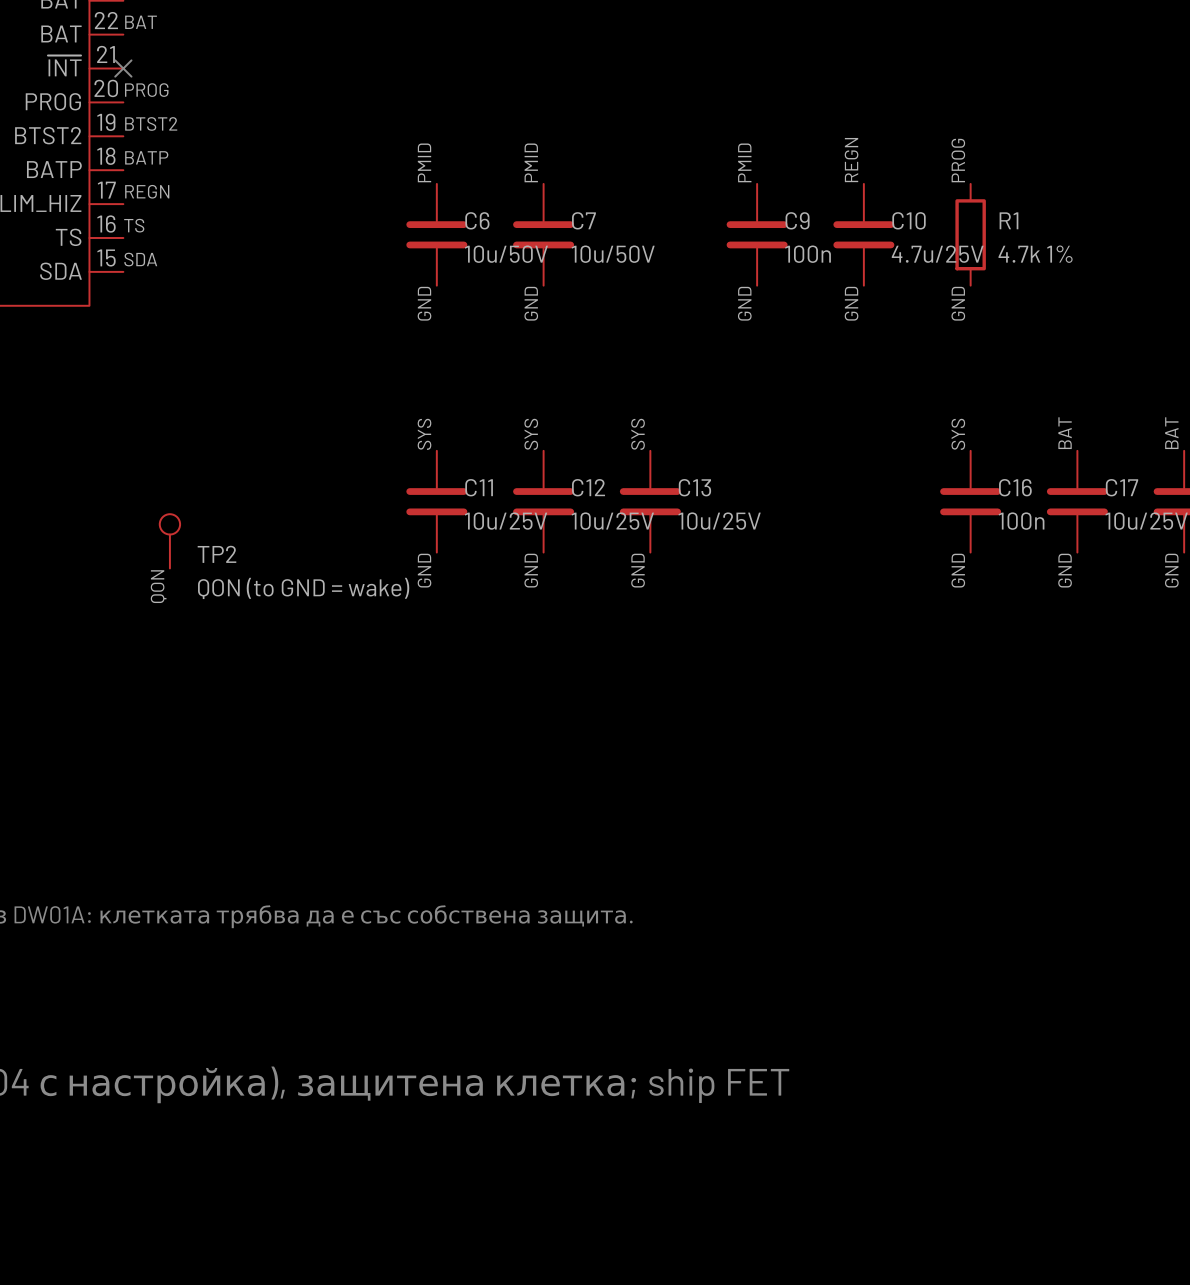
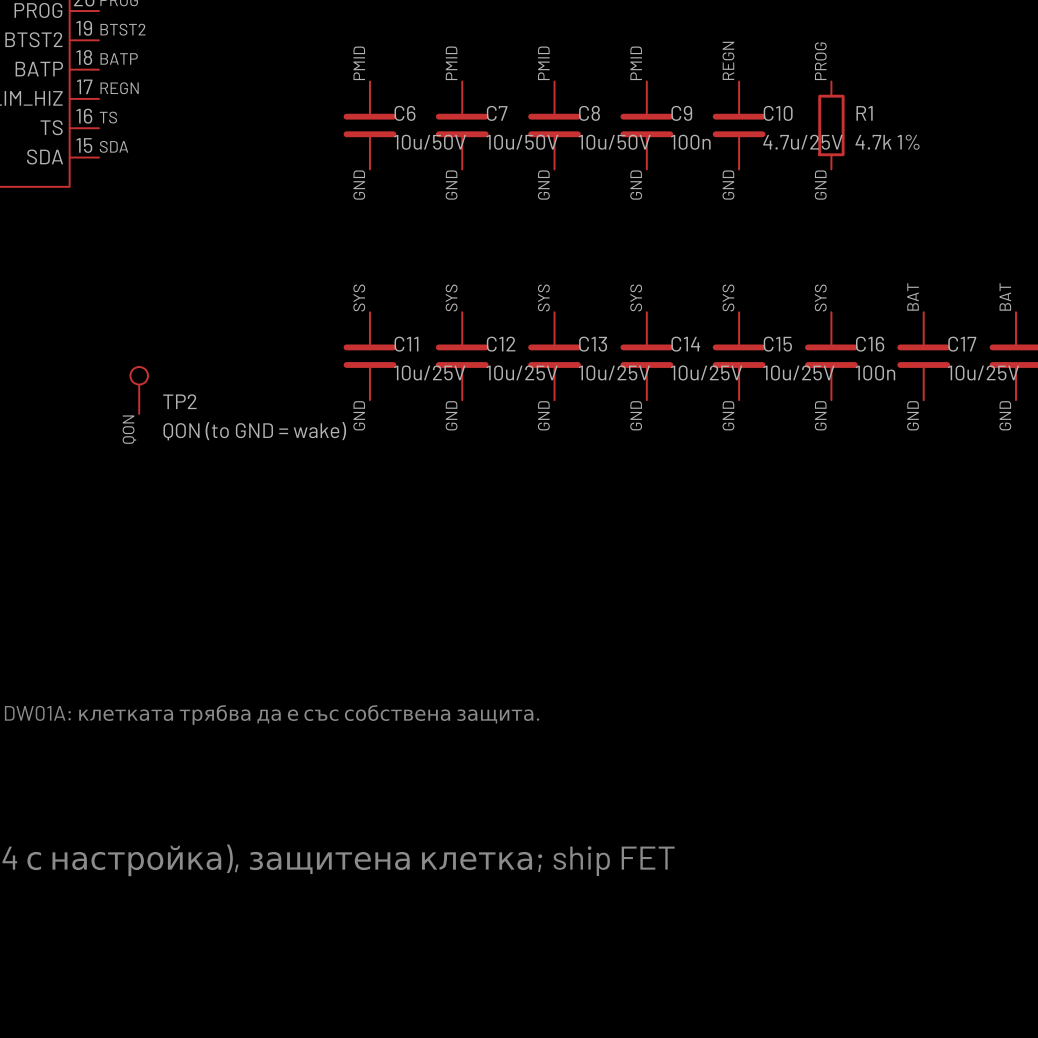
label: none -> PMID (543, 63)
C8: none -> 10u/50V (554, 125)
label: none -> GND (543, 185)
label: none -> SYS (636, 297)
label: none -> SYS (728, 297)
C14: none -> 10u/25V (646, 356)
C15: none -> 10u/25V (739, 356)
label: none -> GND (636, 415)
label: none -> GND (728, 415)

